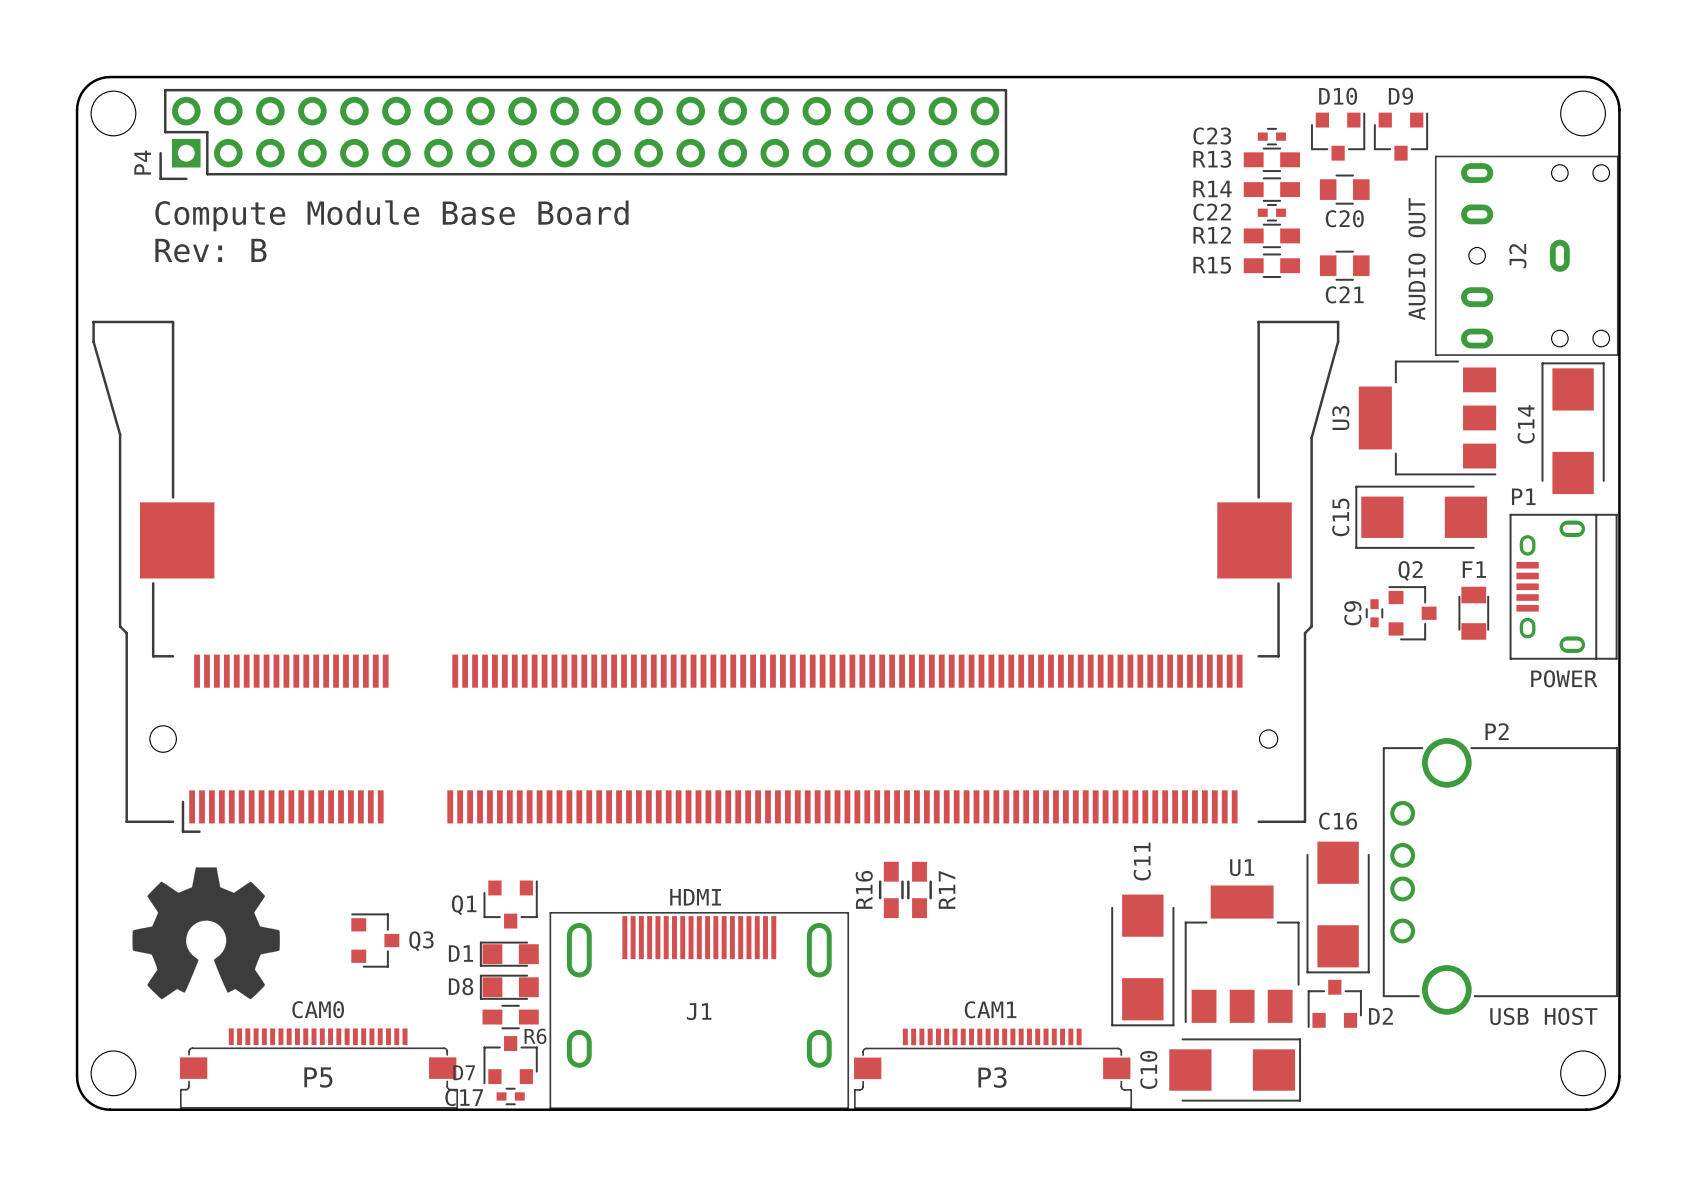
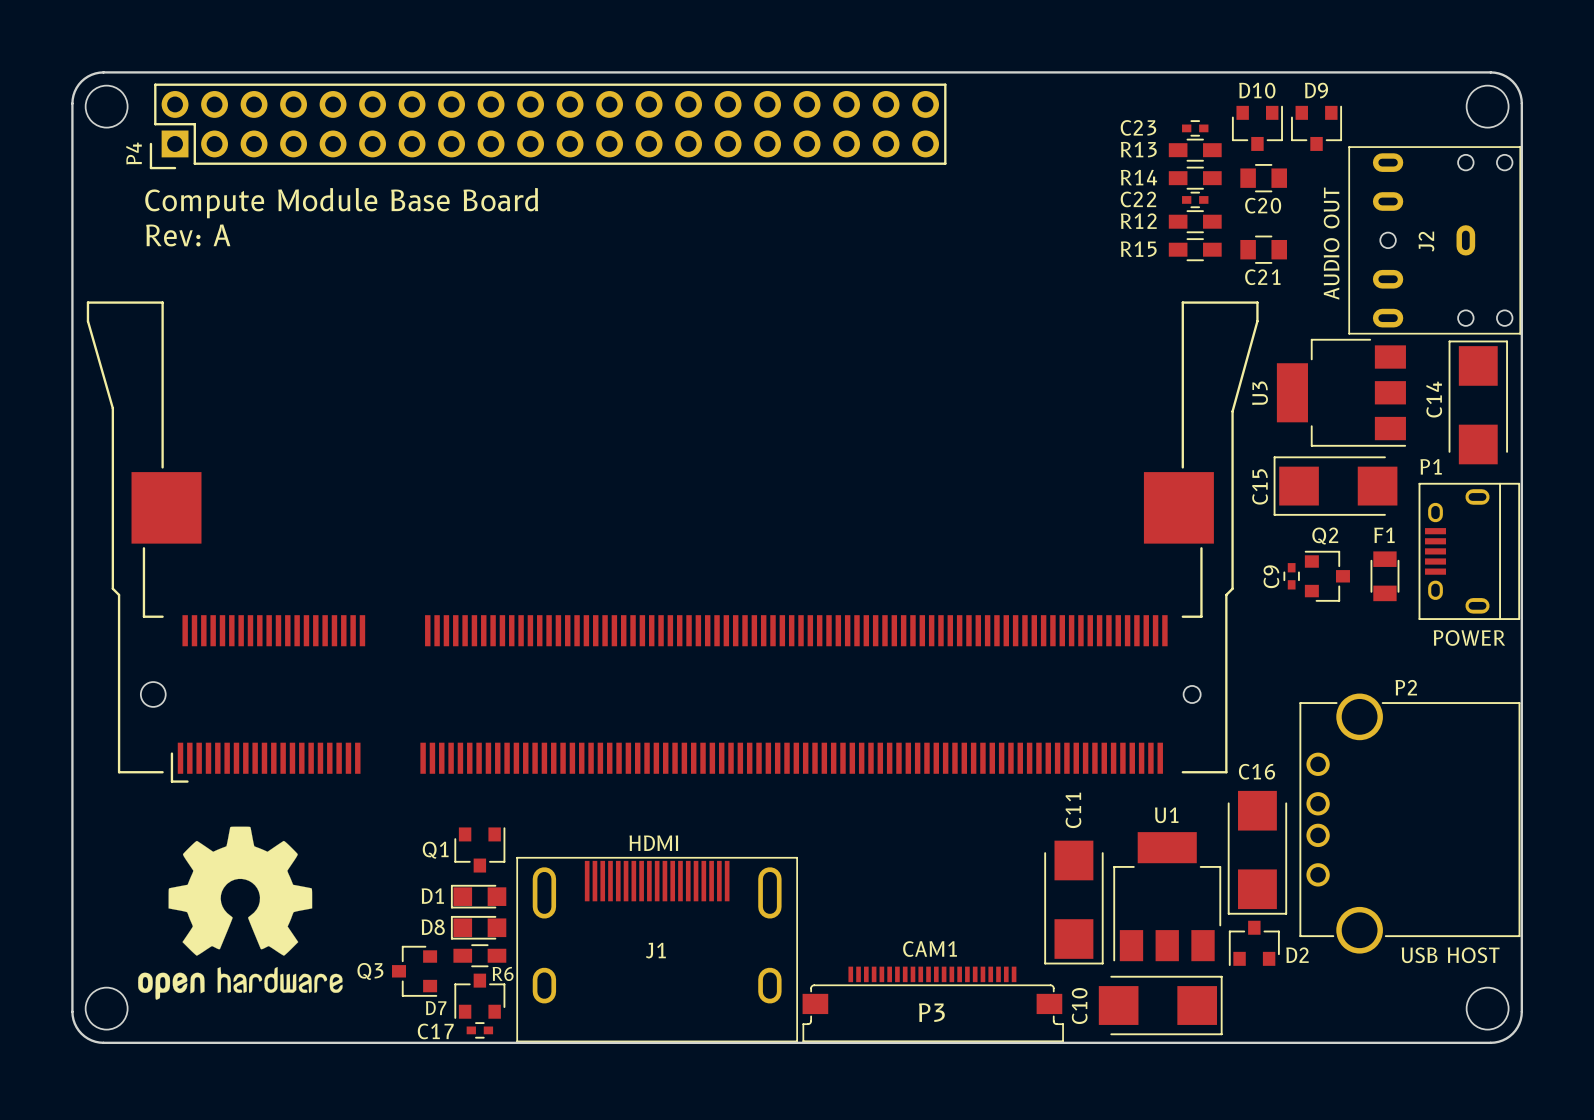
text: Rev: B (210, 250) -> Rev: A (188, 235)
drawing: [132, 867, 280, 1000] -> none
drawing: none -> [138, 826, 343, 1000]
R16: (891, 889) -> none
R17: (919, 889) -> none
Q3 rotation: 0° (375, 940) -> 180° (414, 971)
Q3 position: (375, 940) -> (414, 971)
text: CAM0 (318, 1009) -> none
P5: (318, 1068) -> none

